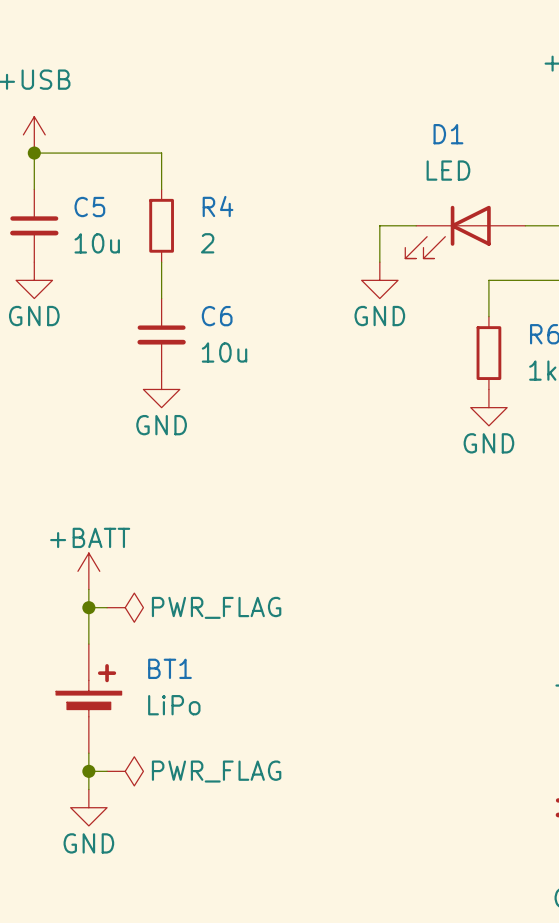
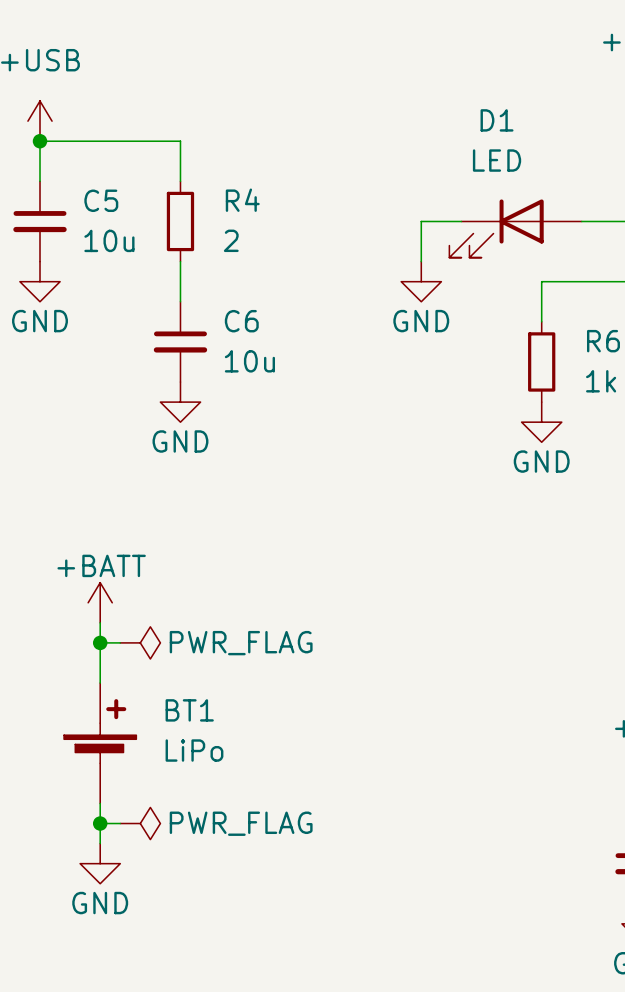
BT1 symbol: [56, 644, 122, 754] -> [64, 683, 137, 804]

